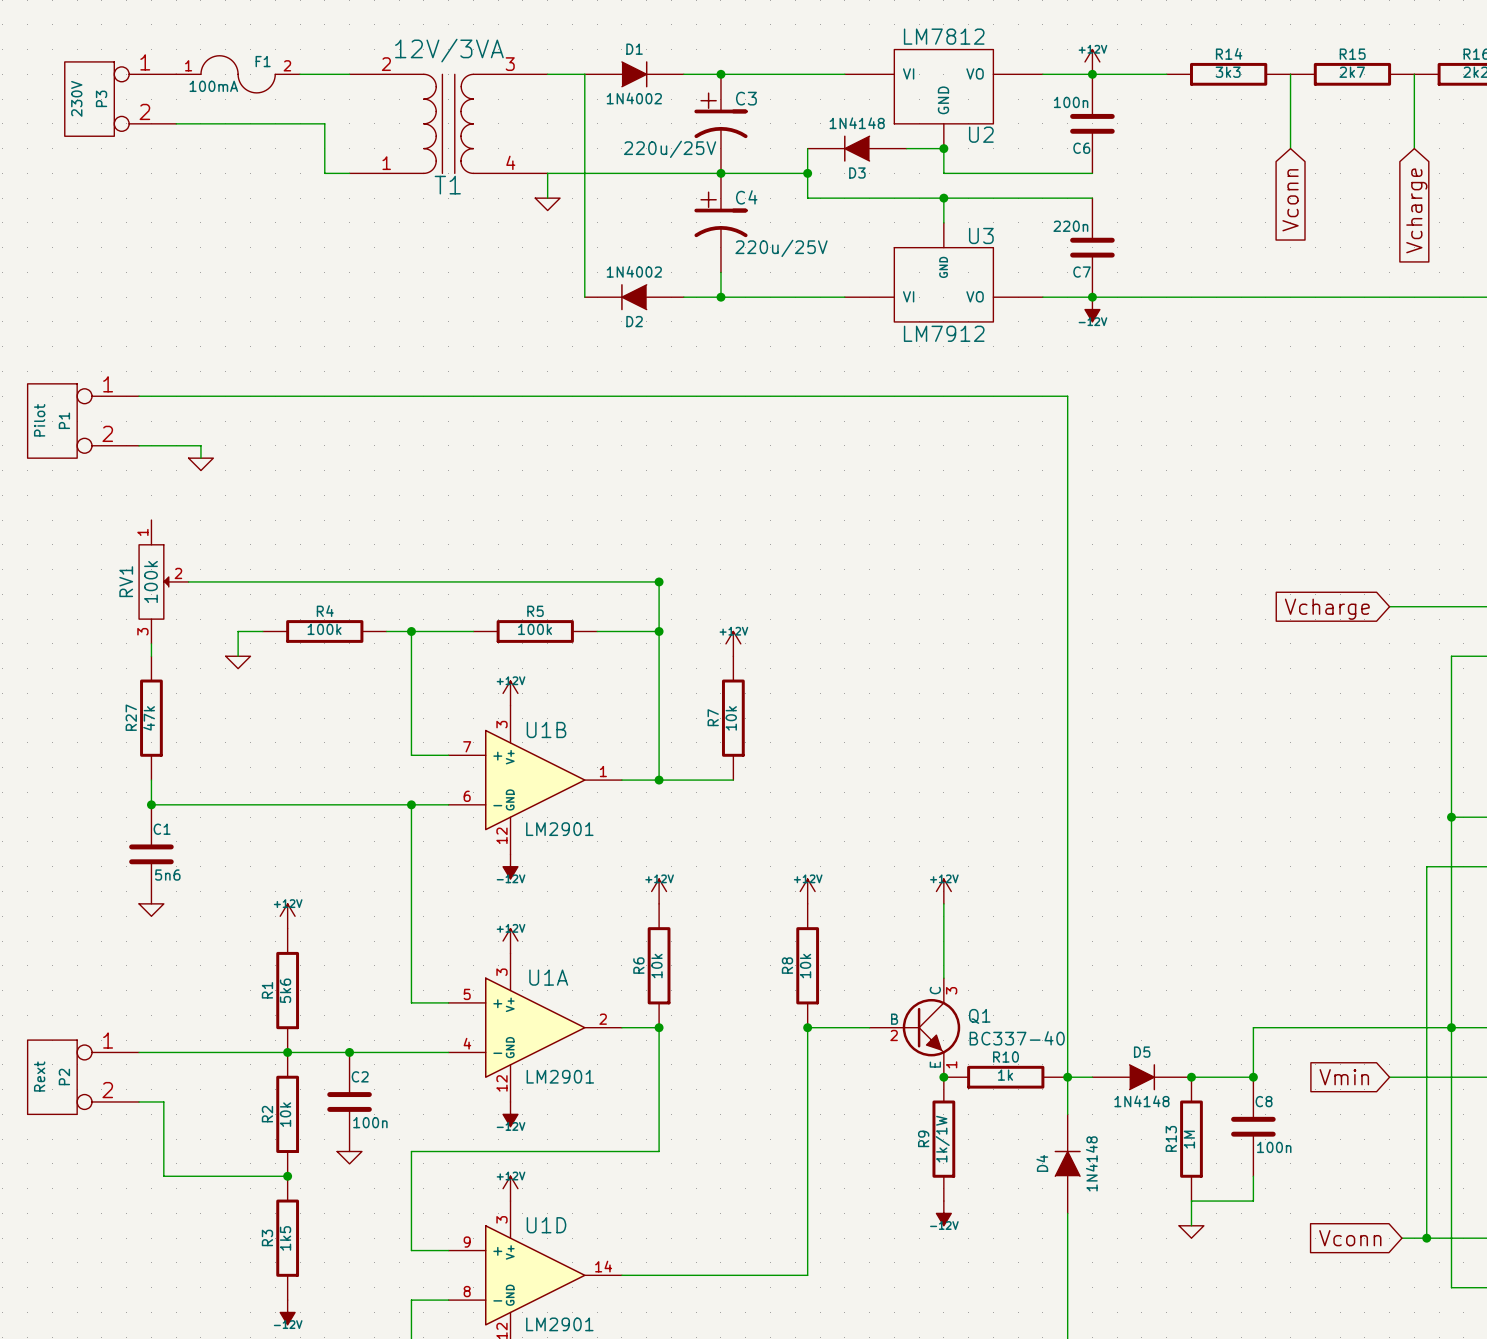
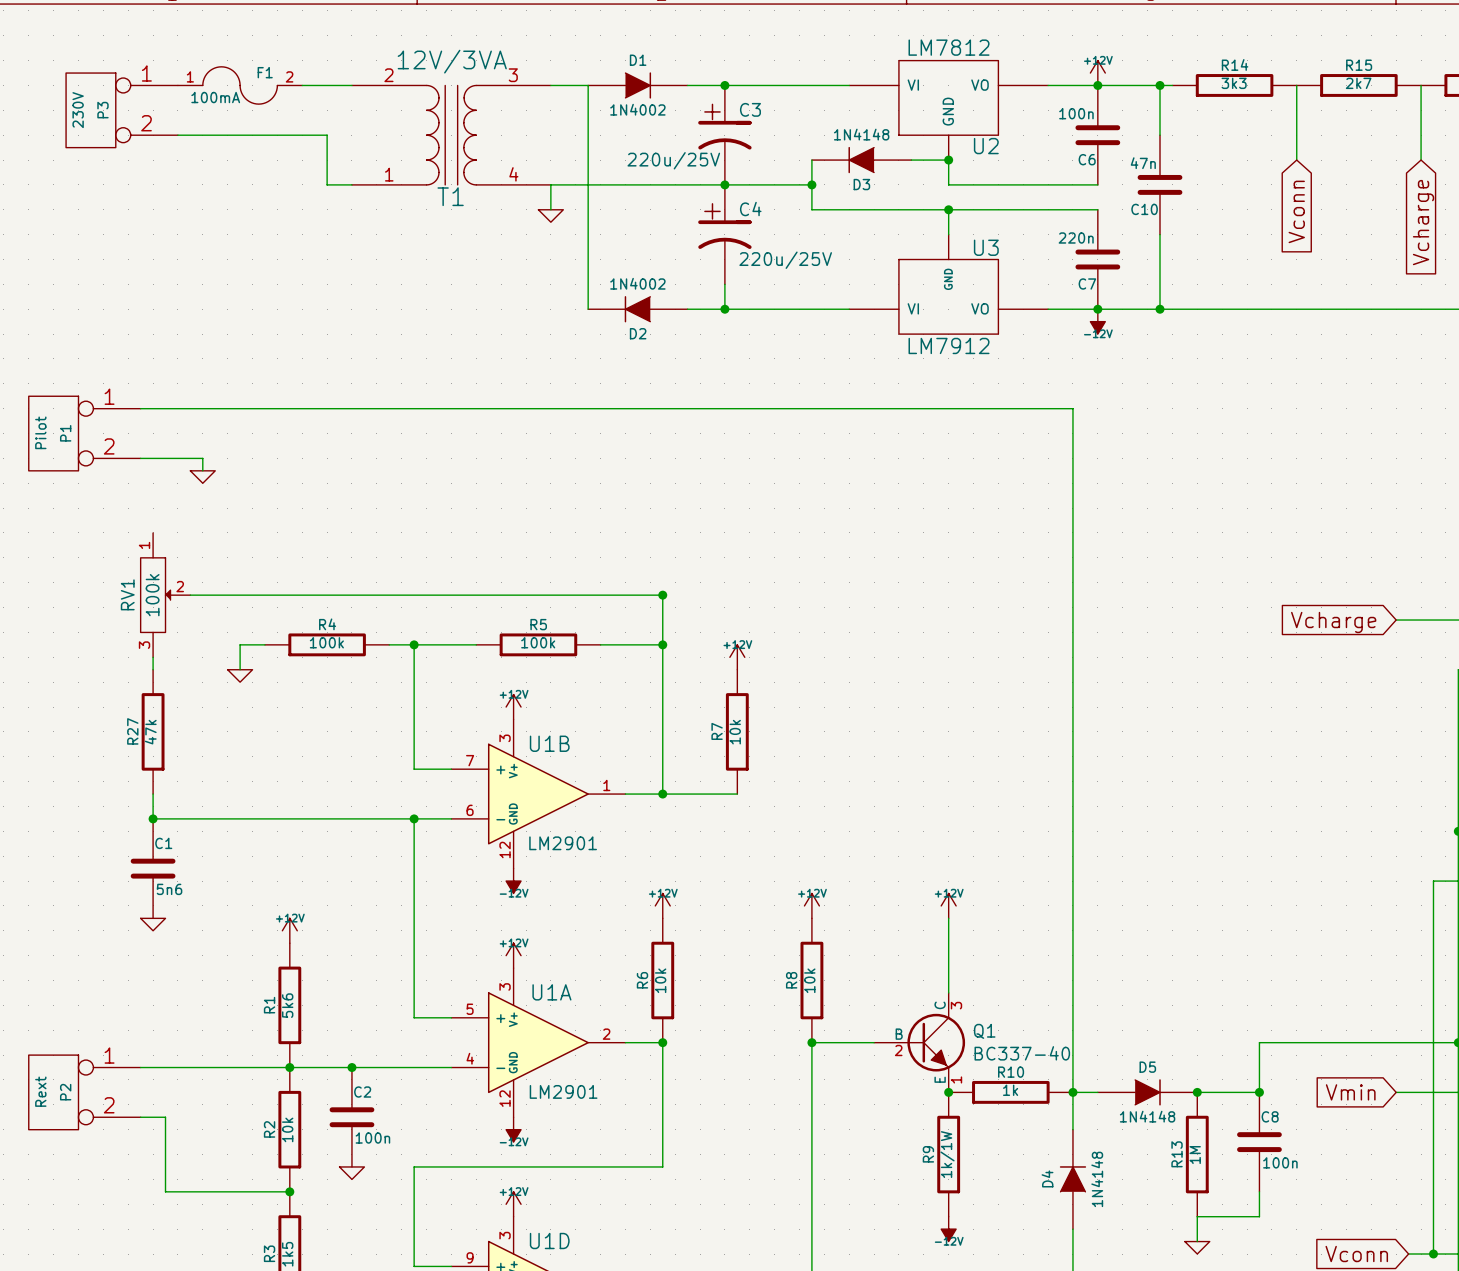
wire: none -> (1160, 85) (1160, 135)
junction: none -> (1160, 85)
C10: none -> 47n (1160, 184)
wire: none -> (1160, 234) (1160, 309)
junction: none -> (1160, 309)

